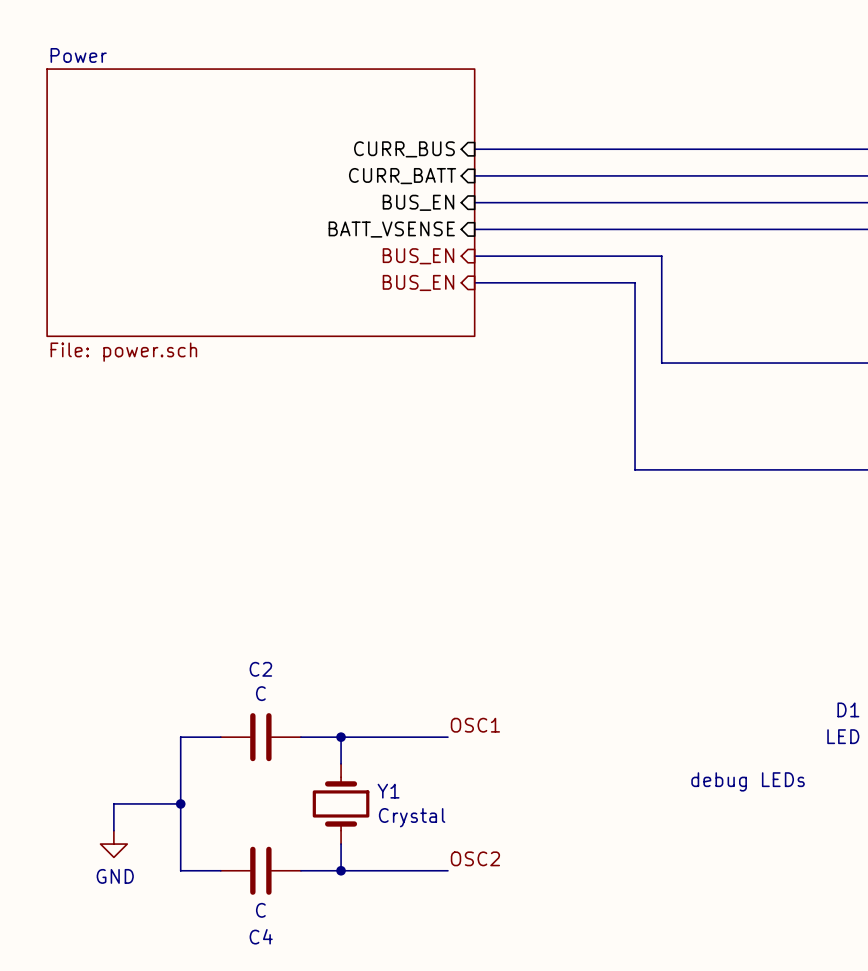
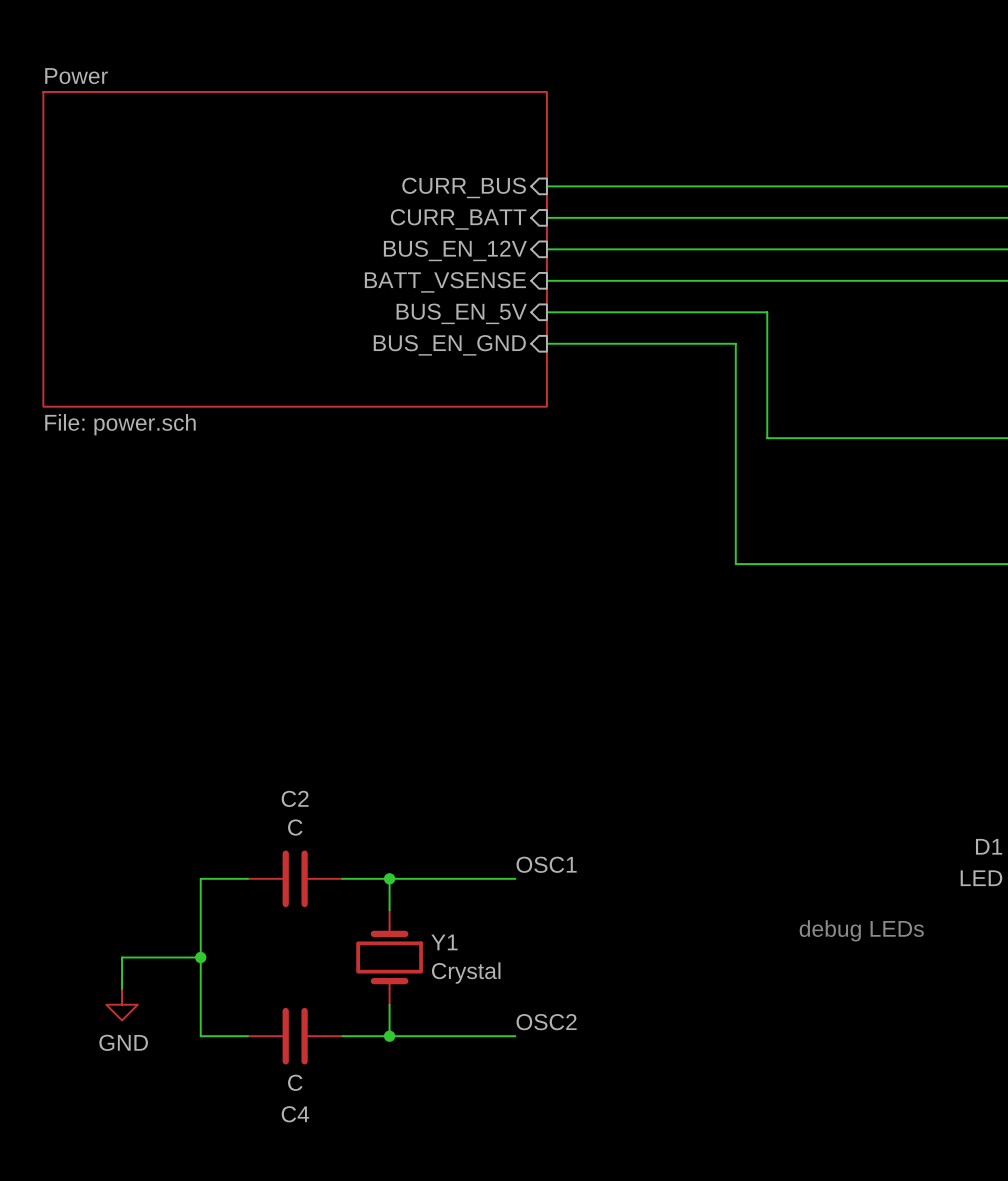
sheet pin: BUS_EN (418, 202) -> BUS_EN_12V (455, 250)
hierarchical label: BUS_EN (418, 256) -> BUS_EN_5V (461, 313)
hierarchical label: BUS_EN (418, 282) -> BUS_EN_GND (449, 345)

